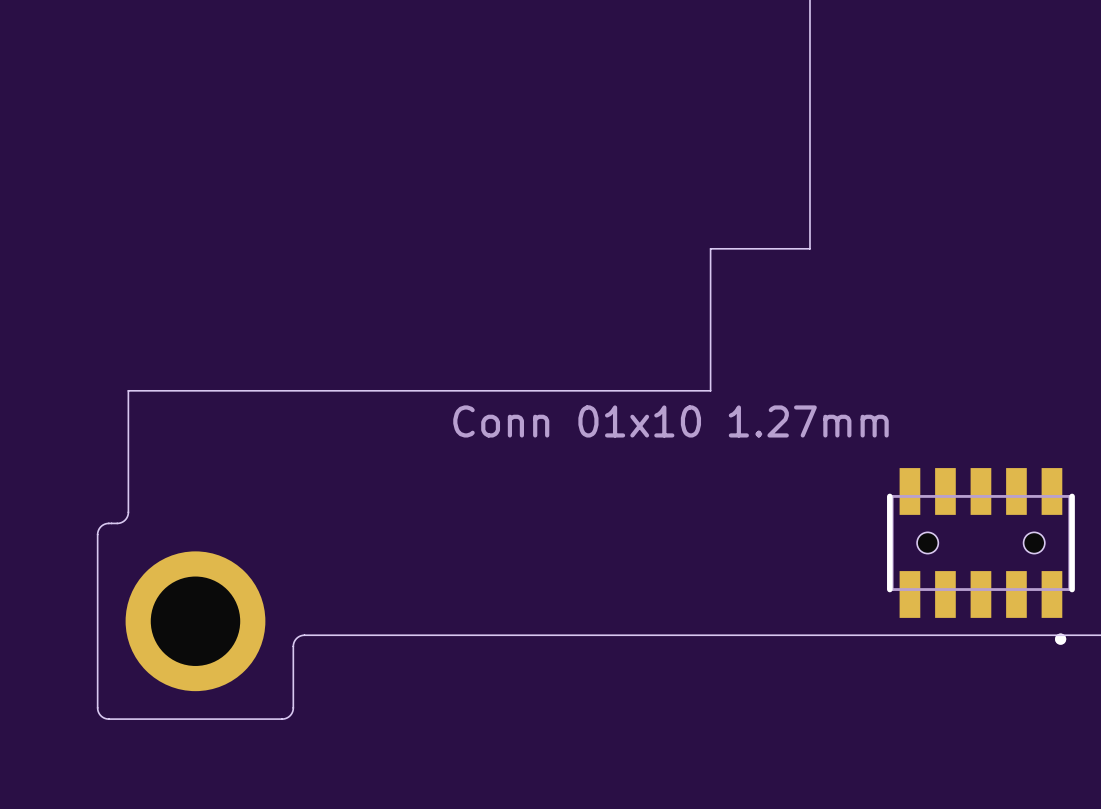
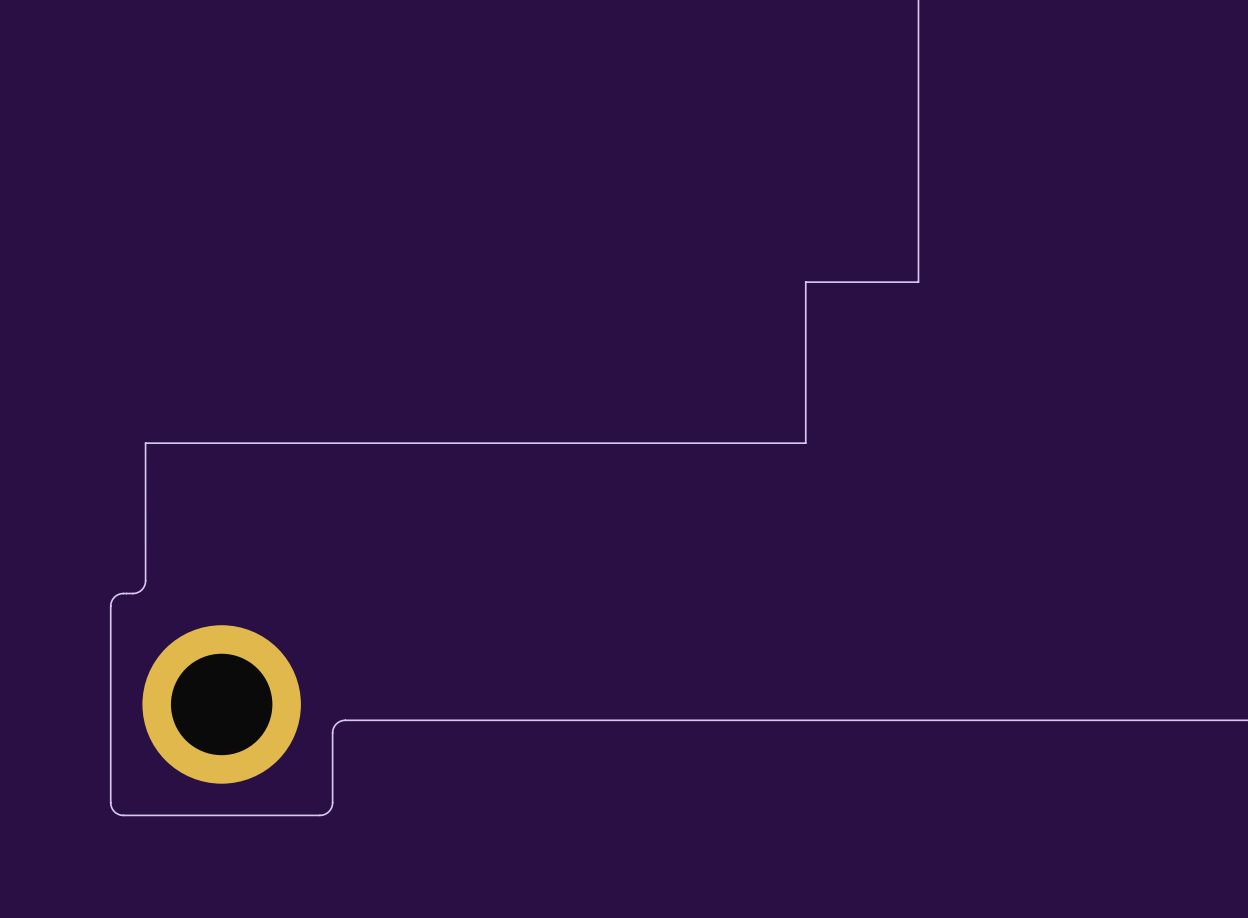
part: Conn 01x10 1.27mm (980, 556) -> none

